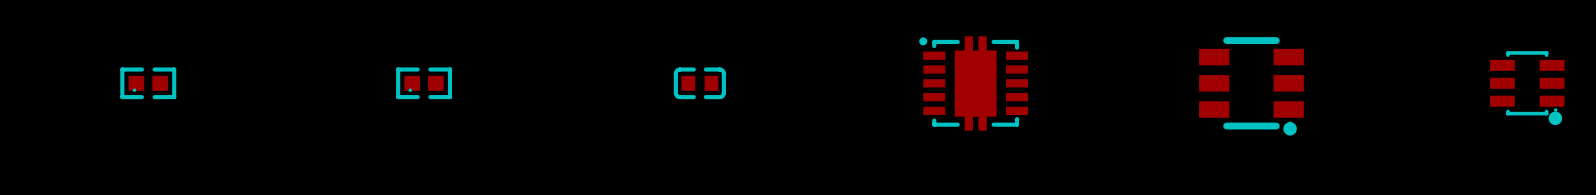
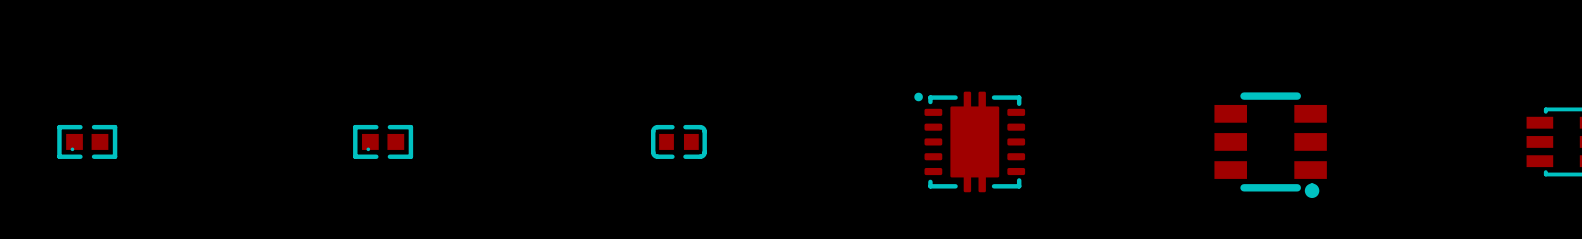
part footprint: [919, 36, 1029, 131] -> [914, 91, 1026, 193]

